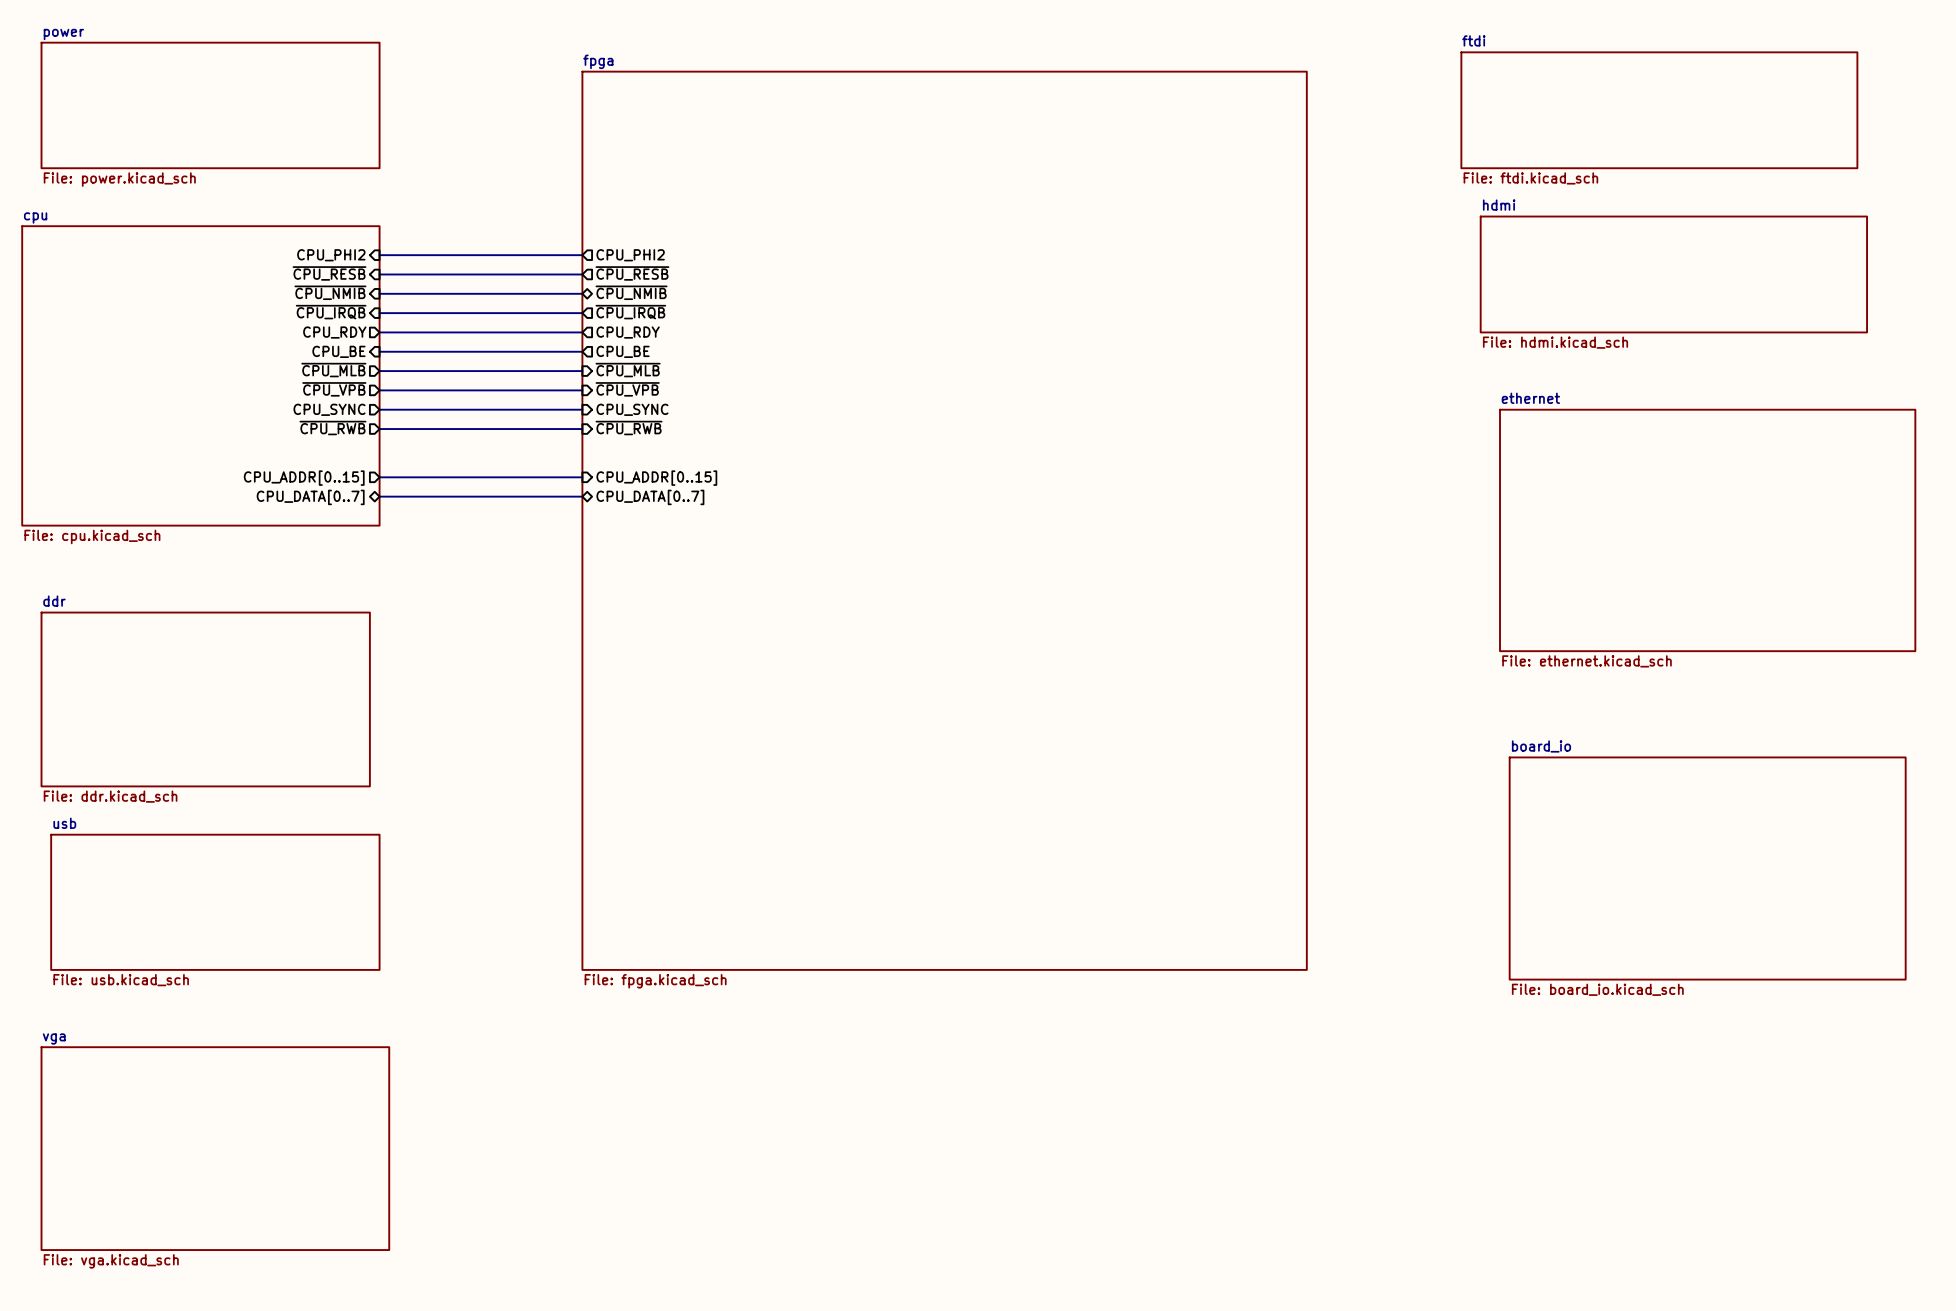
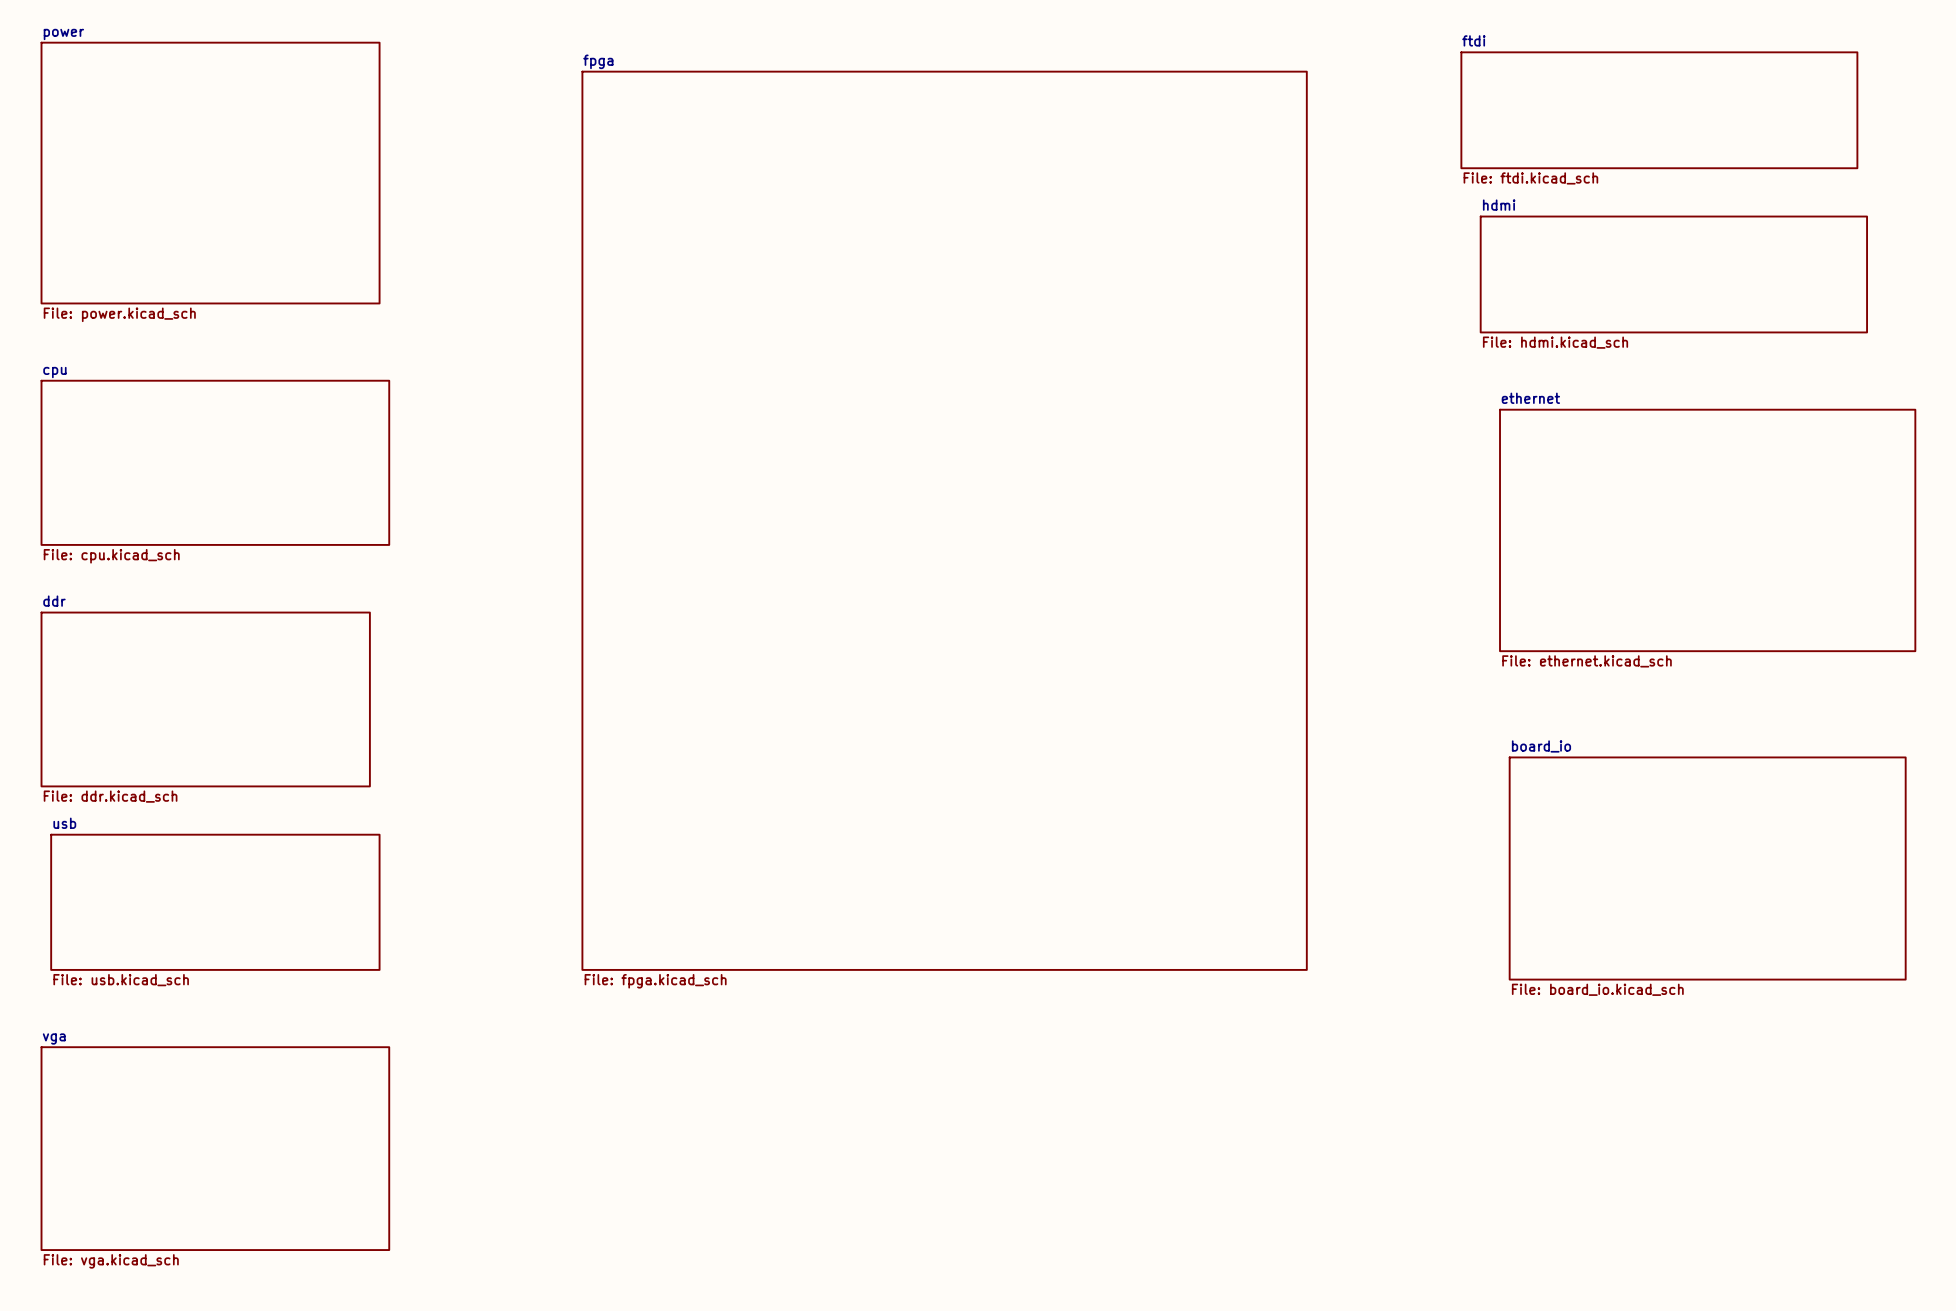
sheet power: File: power.kicad_sch (210, 105) -> none
sheet power: none -> File: power.kicad_sch (210, 173)
sheet pin: CPU_PHI2 (331, 255) -> none
wire: (379, 255) (582, 255) -> none
sheet pin: CPU_PHI2 (630, 255) -> none
sheet pin: ~{CPU_RESB} (329, 273) -> none
sheet pin: ~{CPU_RESB} (632, 273) -> none
wire: (379, 274) (582, 274) -> none
sheet pin: ~{CPU_NMIB} (330, 292) -> none
sheet pin: ~{CPU_NMIB} (631, 292) -> none
wire: (379, 293) (582, 293) -> none
sheet pin: ~{CPU_IRQB} (331, 312) -> none
sheet pin: ~{CPU_IRQB} (630, 312) -> none
wire: (379, 313) (582, 313) -> none
sheet pin: CPU_RDY (334, 332) -> none
wire: (379, 332) (582, 332) -> none
sheet pin: CPU_RDY (628, 332) -> none
sheet pin: CPU_BE (338, 351) -> none
wire: (379, 351) (582, 351) -> none
sheet pin: CPU_BE (623, 351) -> none
sheet pin: ~{CPU_MLB} (333, 370) -> none
sheet pin: ~{CPU_MLB} (628, 370) -> none
wire: (379, 371) (582, 371) -> none
sheet cpu: File: cpu.kicad_sch (200, 375) -> none
sheet pin: ~{CPU_VPB} (334, 389) -> none
sheet pin: ~{CPU_VPB} (627, 389) -> none
wire: (379, 390) (582, 390) -> none
sheet pin: CPU_SYNC (329, 409) -> none
wire: (379, 409) (582, 409) -> none
sheet pin: CPU_SYNC (632, 409) -> none
sheet pin: ~{CPU_RWB} (332, 428) -> none
sheet pin: ~{CPU_RWB} (629, 428) -> none
wire: (379, 429) (582, 429) -> none
sheet cpu: none -> File: cpu.kicad_sch (215, 462)
bus: (379, 477) (582, 477) -> none
sheet pin: CPU_ADDR[0..15] (304, 478) -> none
sheet pin: CPU_ADDR[0..15] (656, 478) -> none
bus: (379, 496) (582, 496) -> none
sheet pin: CPU_DATA[0..7] (310, 497) -> none
sheet pin: CPU_DATA[0..7] (650, 497) -> none

